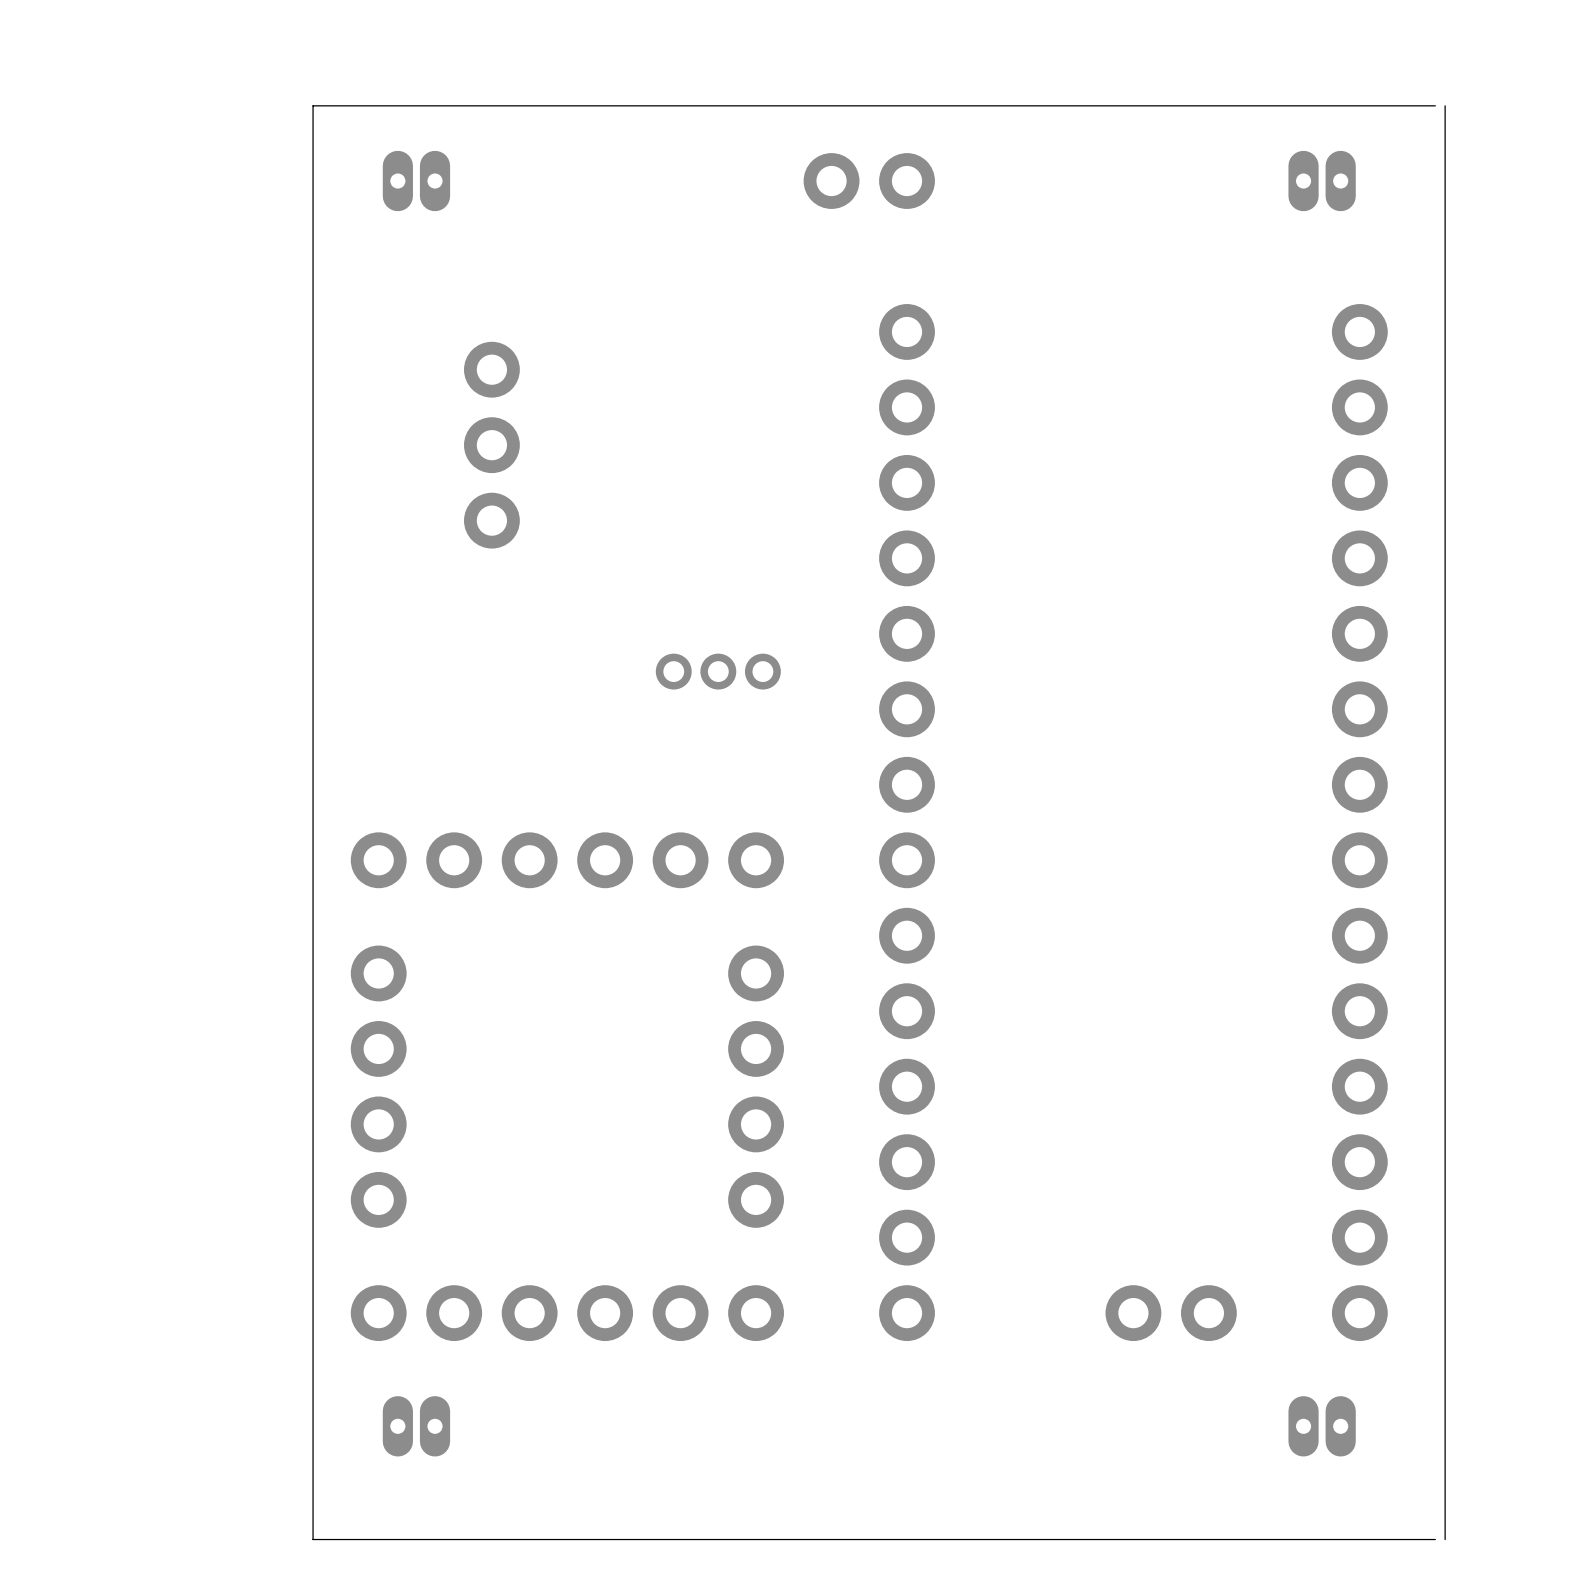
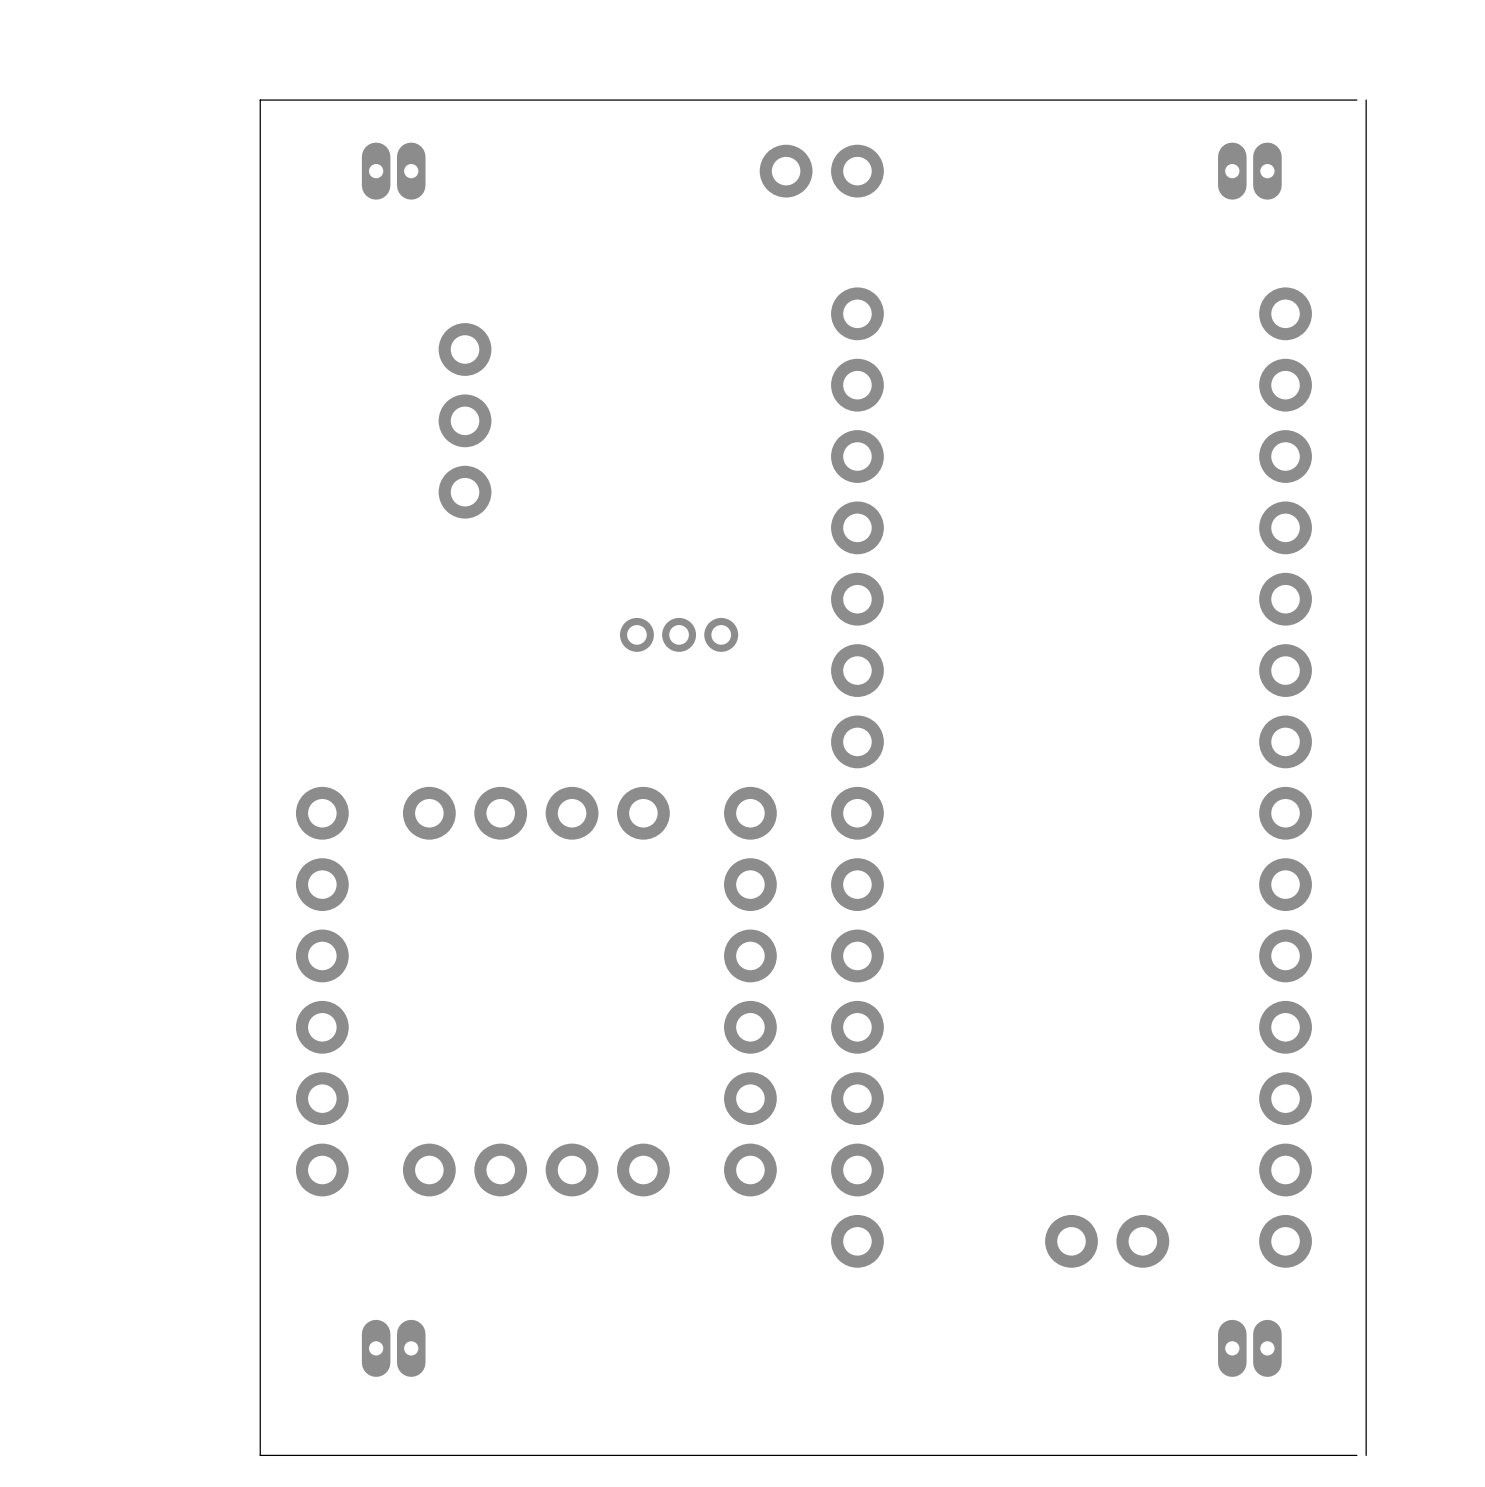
board edge: (313, 105) (313, 1539) -> (295, 100) (260, 100) (260, 1455) (295, 1455)
part footprint: [350, 832, 784, 889] -> [402, 786, 670, 840]
part: none -> (322, 991)
part: none -> (750, 991)
part: (378, 1086) -> none
part: (756, 1086) -> none
part: none -> (536, 1170)
part: (567, 1313) -> none

